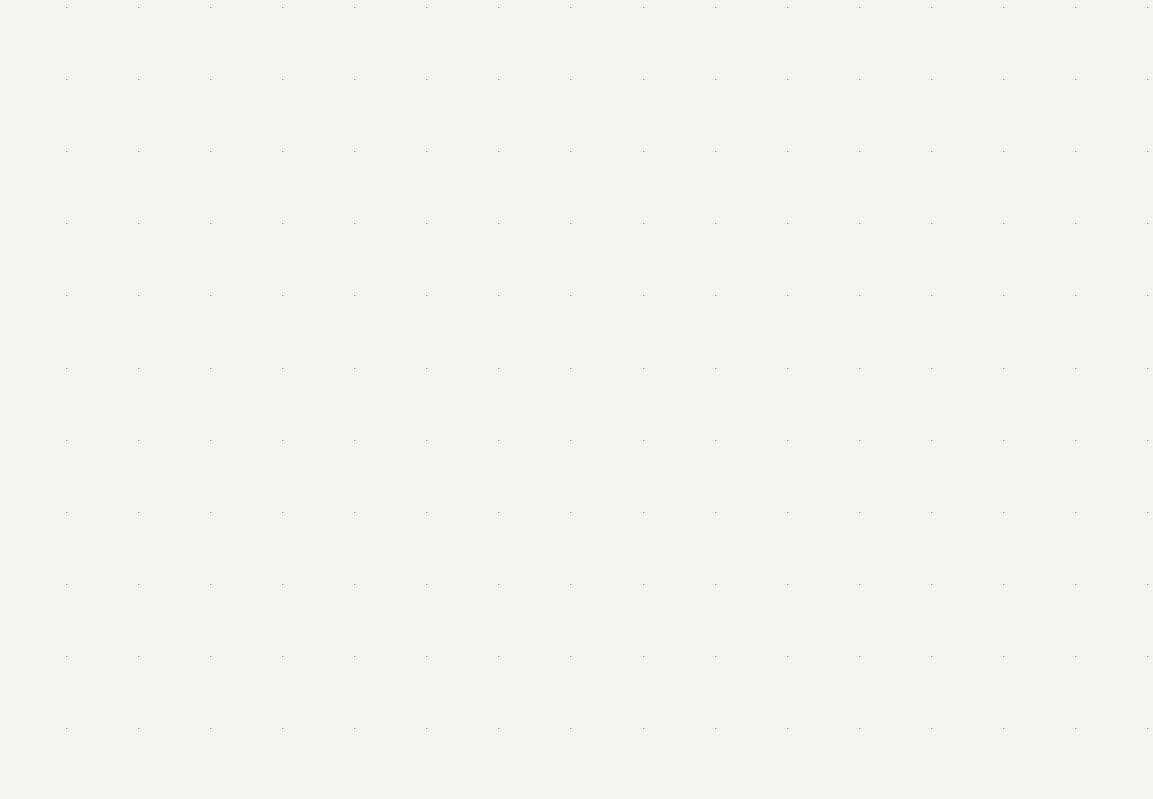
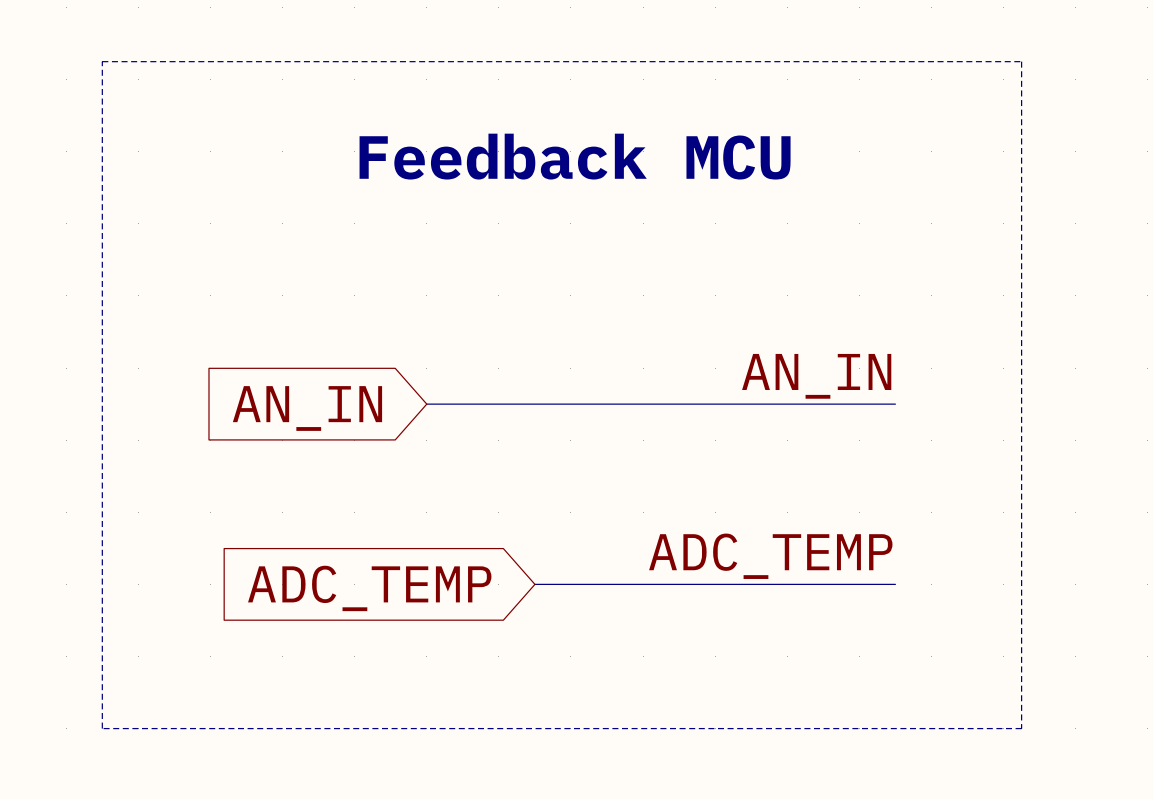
line: none -> (102, 61) (1021, 61) (1021, 728) (102, 728) (102, 61)
text: none -> Feedback MCU (575, 156)
label: none -> AN_IN (816, 376)
wire: none -> (426, 404) (895, 404)
global label: none -> AN_IN (307, 408)
label: none -> ADC_TEMP (770, 556)
wire: none -> (534, 584) (895, 584)
global label: none -> ADC_TEMP (369, 588)

